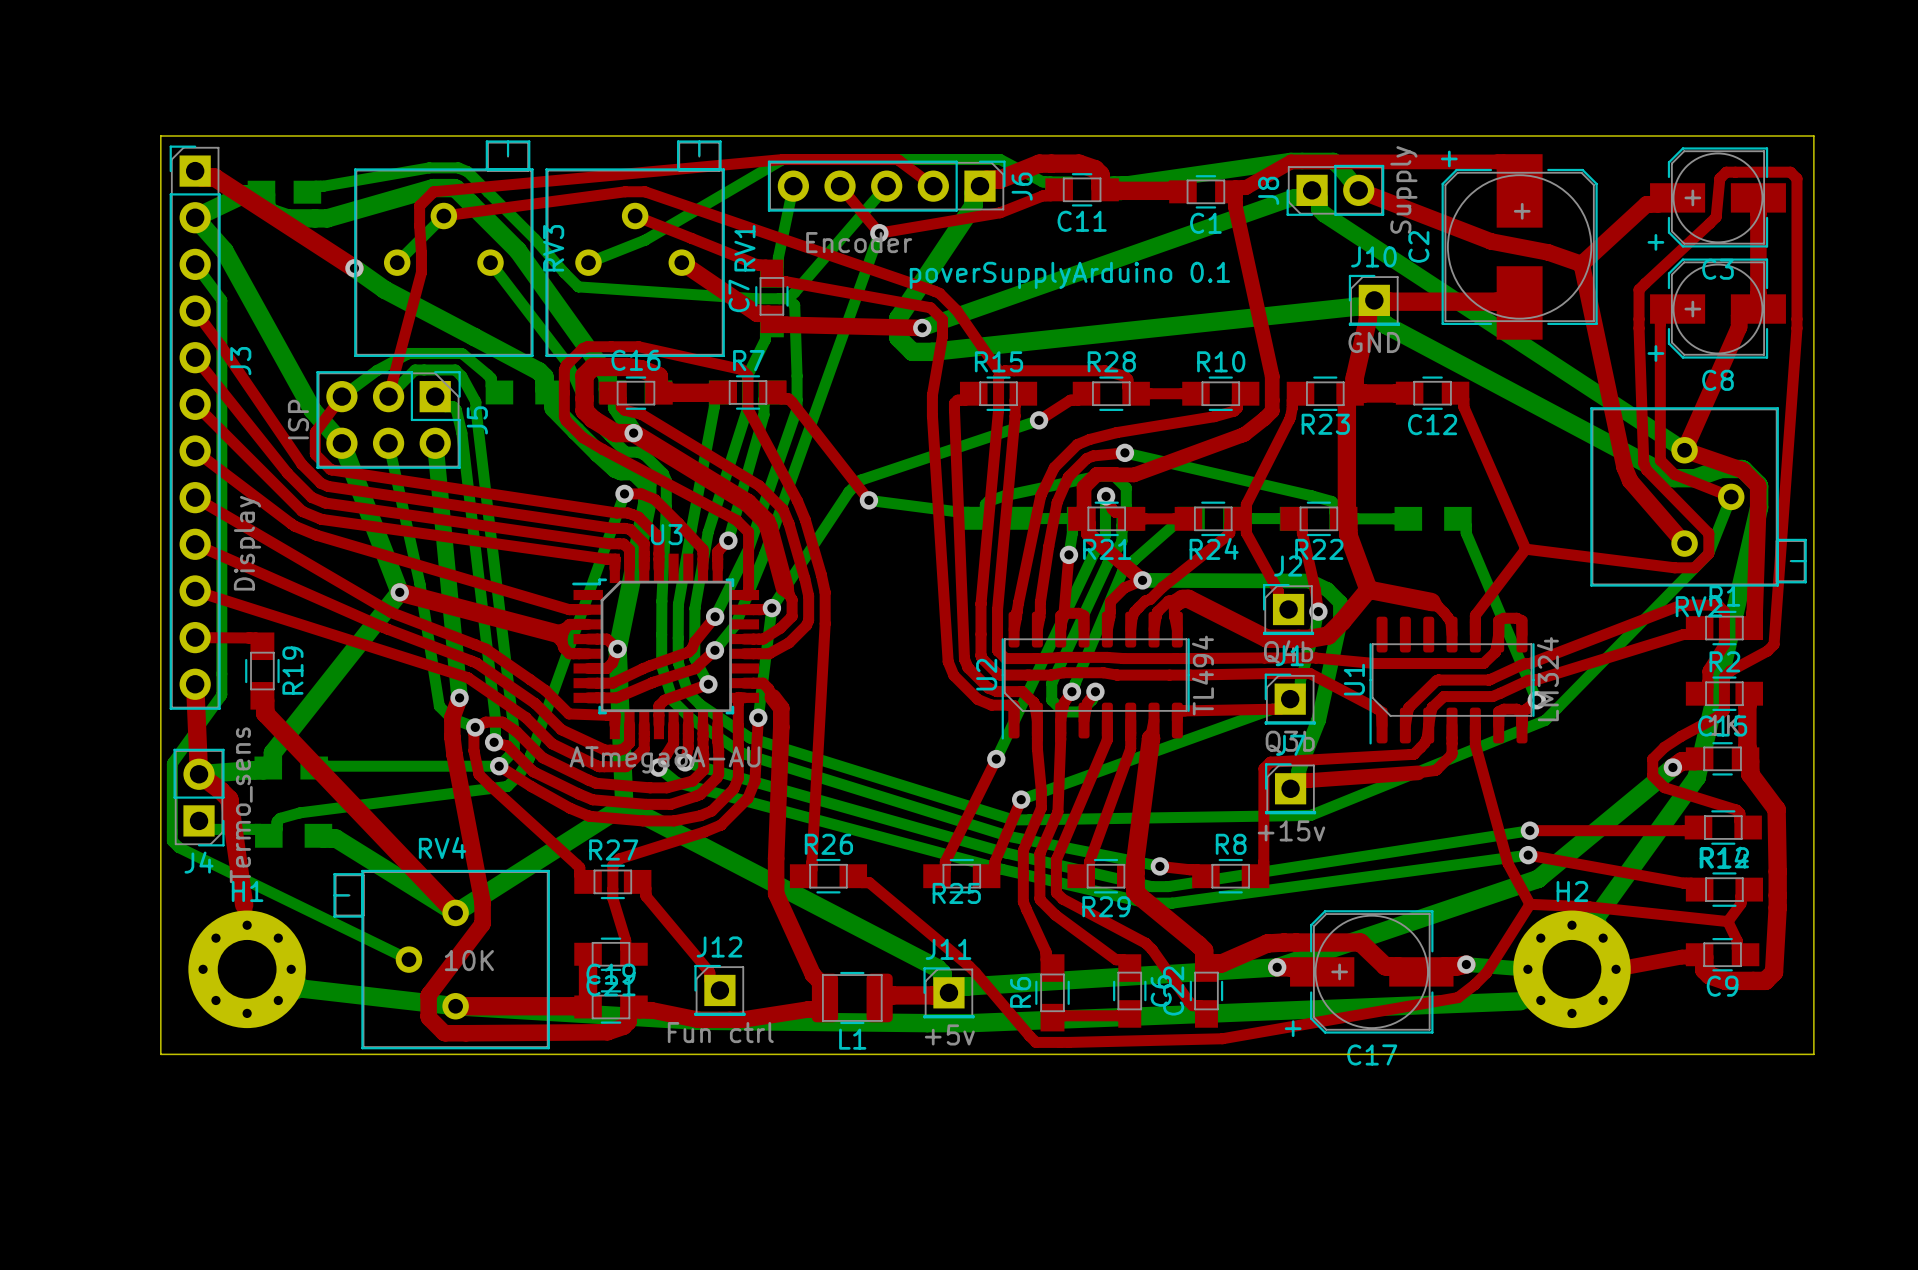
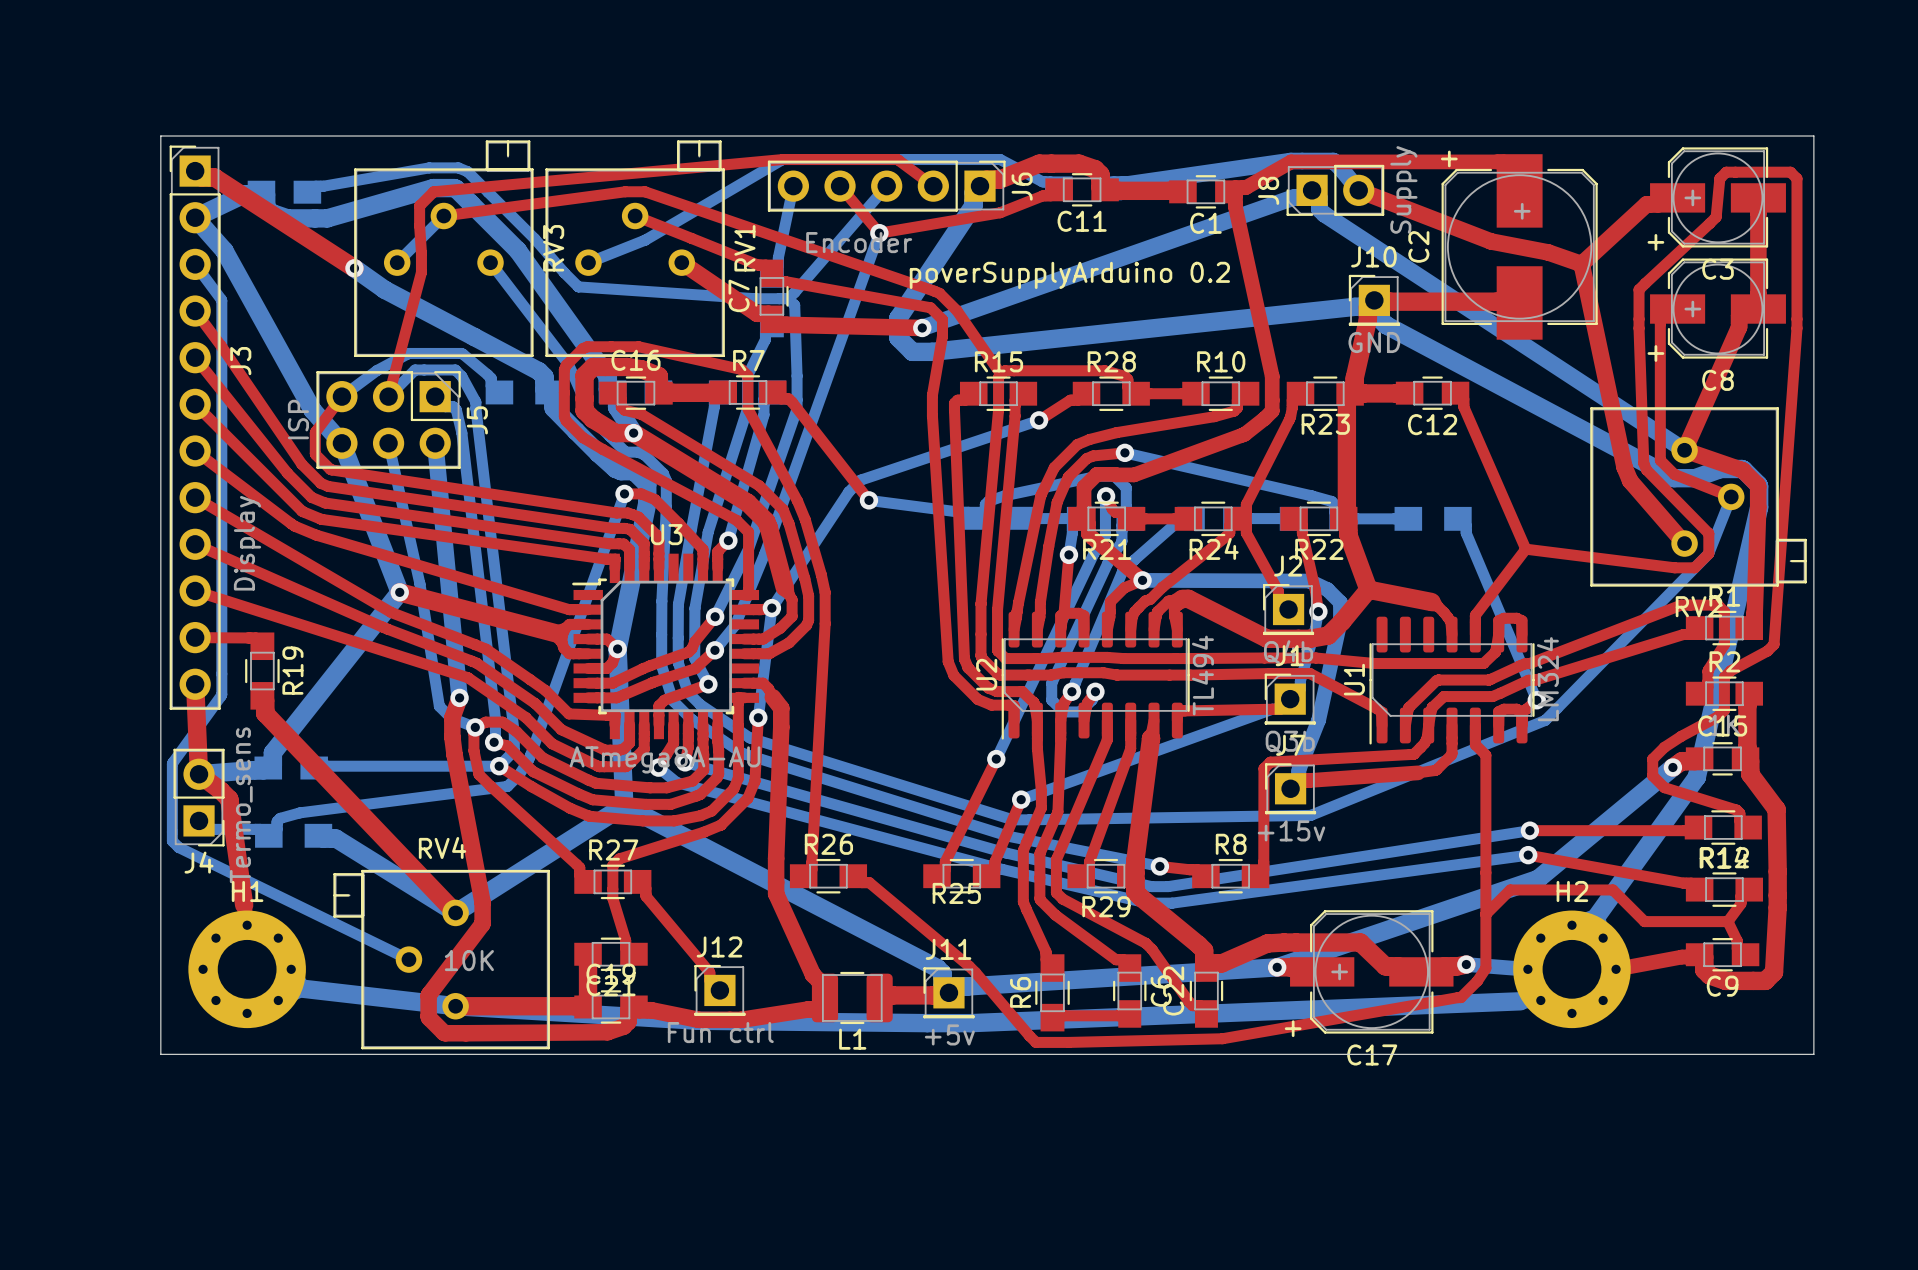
text: poverSupplyArduino 0.1 (1069, 275) -> poverSupplyArduino 0.2 (1069, 275)
top track: (1475, 744) (1507, 863) (1529, 904) -> (1475, 744) (1485, 755) (1485, 968) (1477, 980) (1460, 997) (1458, 997)
top track: (1529, 904) (1589, 906) (1727, 921) -> (1485, 914) (1510, 889) (1612, 889) (1644, 921) (1727, 921)
top track: (1529, 904) (1486, 972) (1458, 997) -> none

